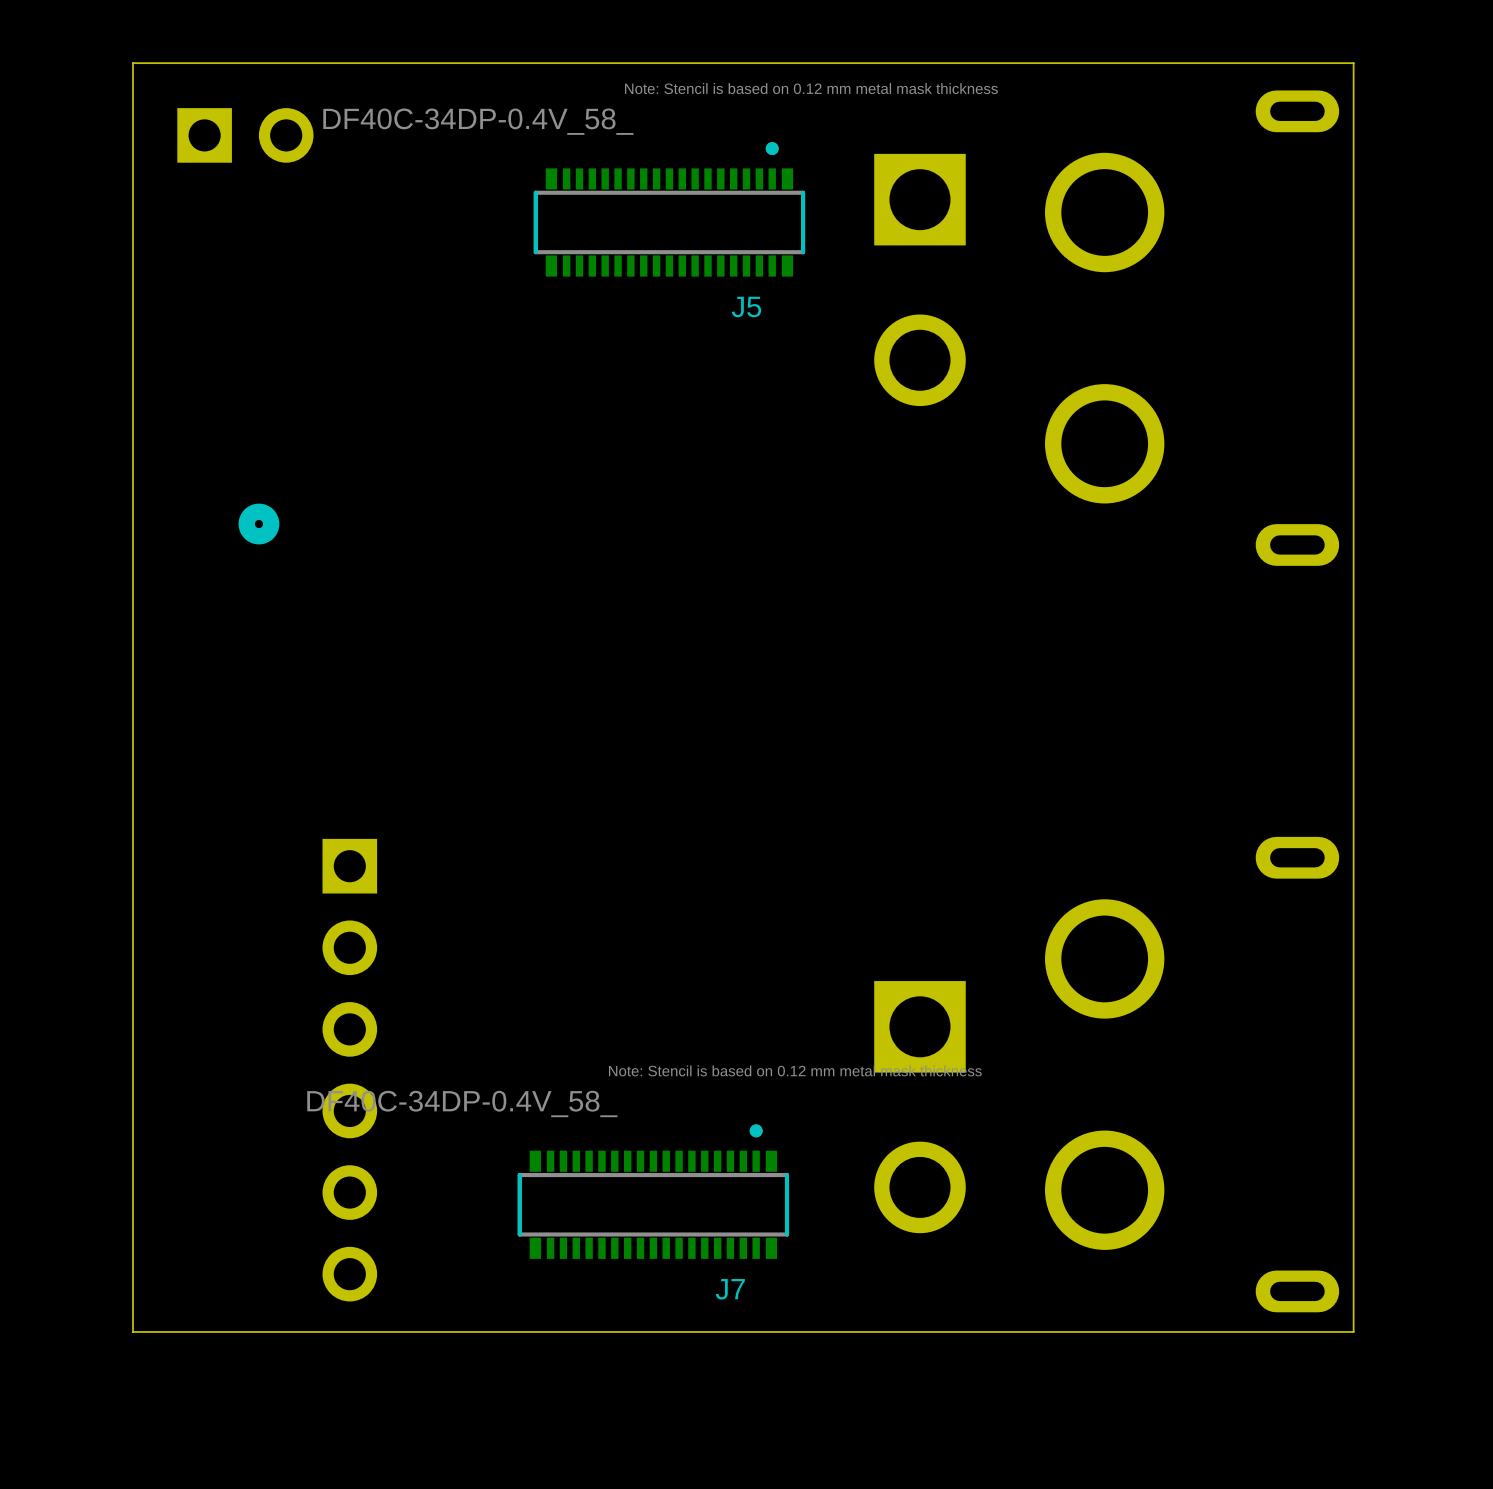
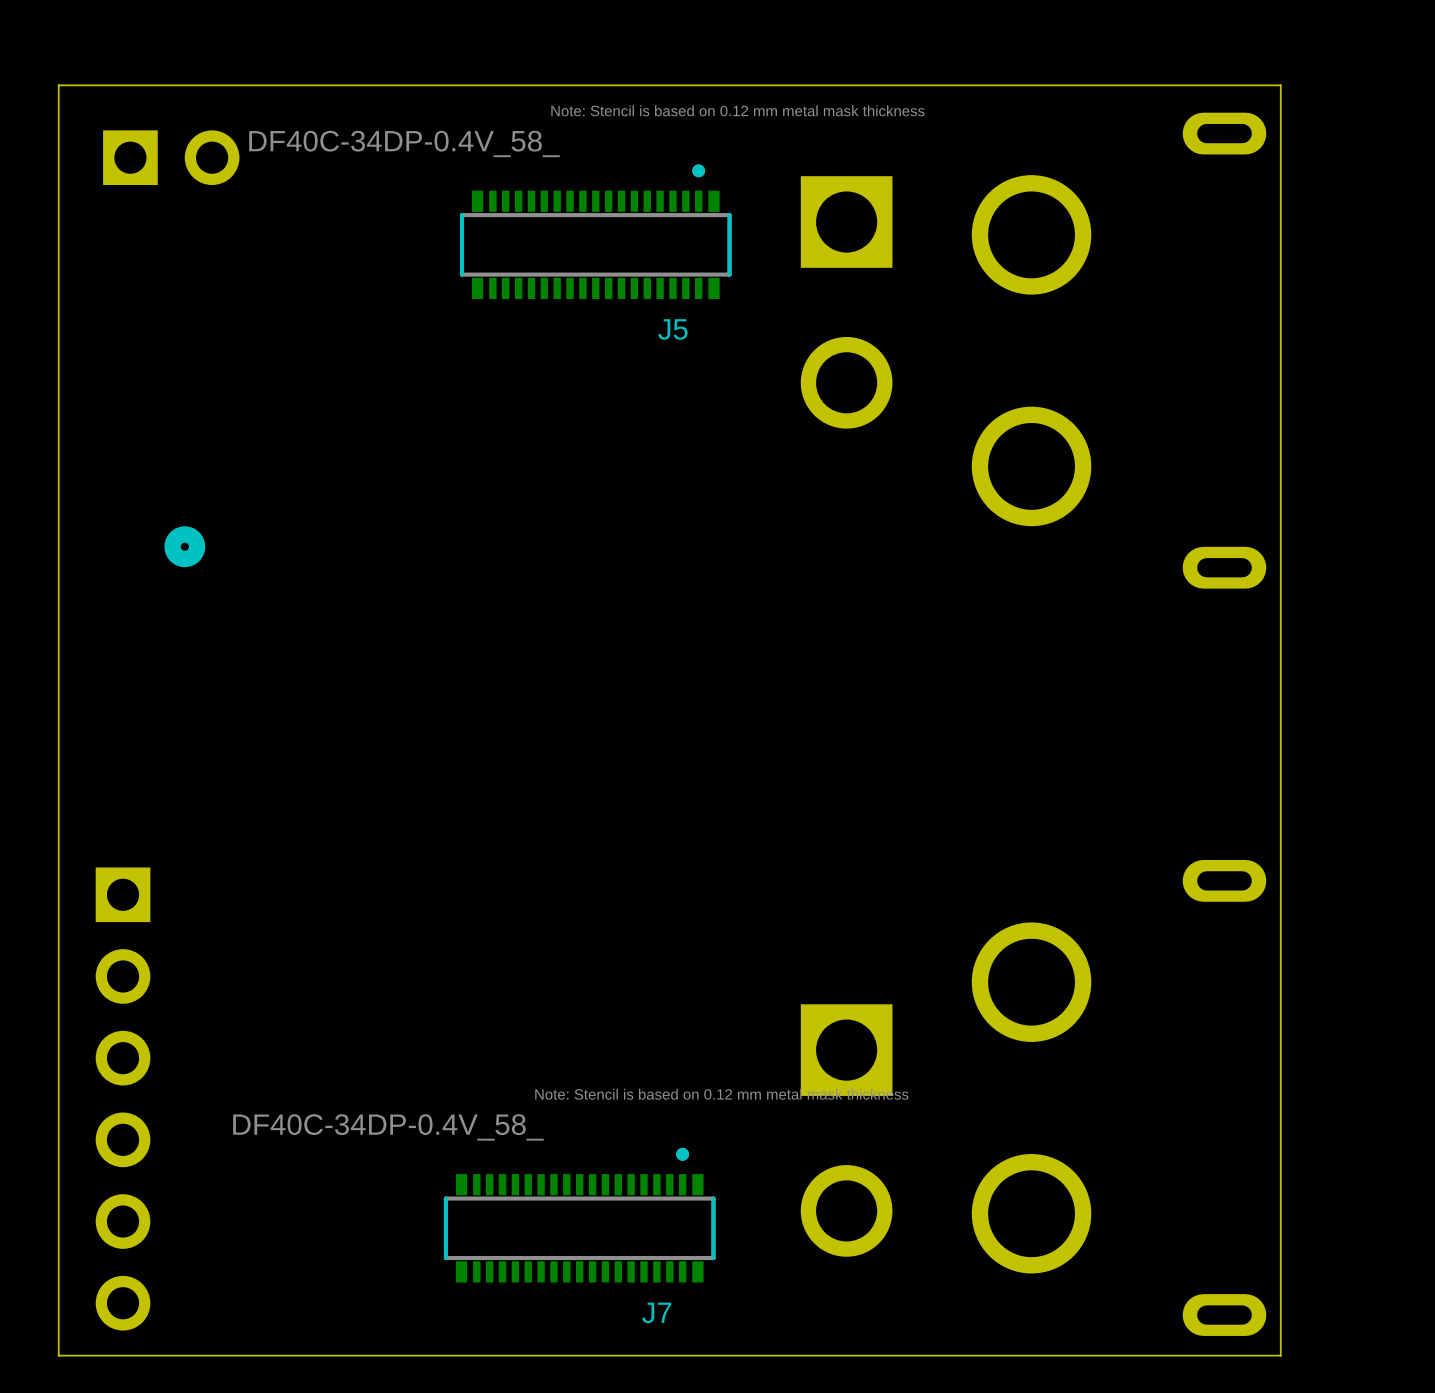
part position: (349, 1070) -> (123, 1099)

